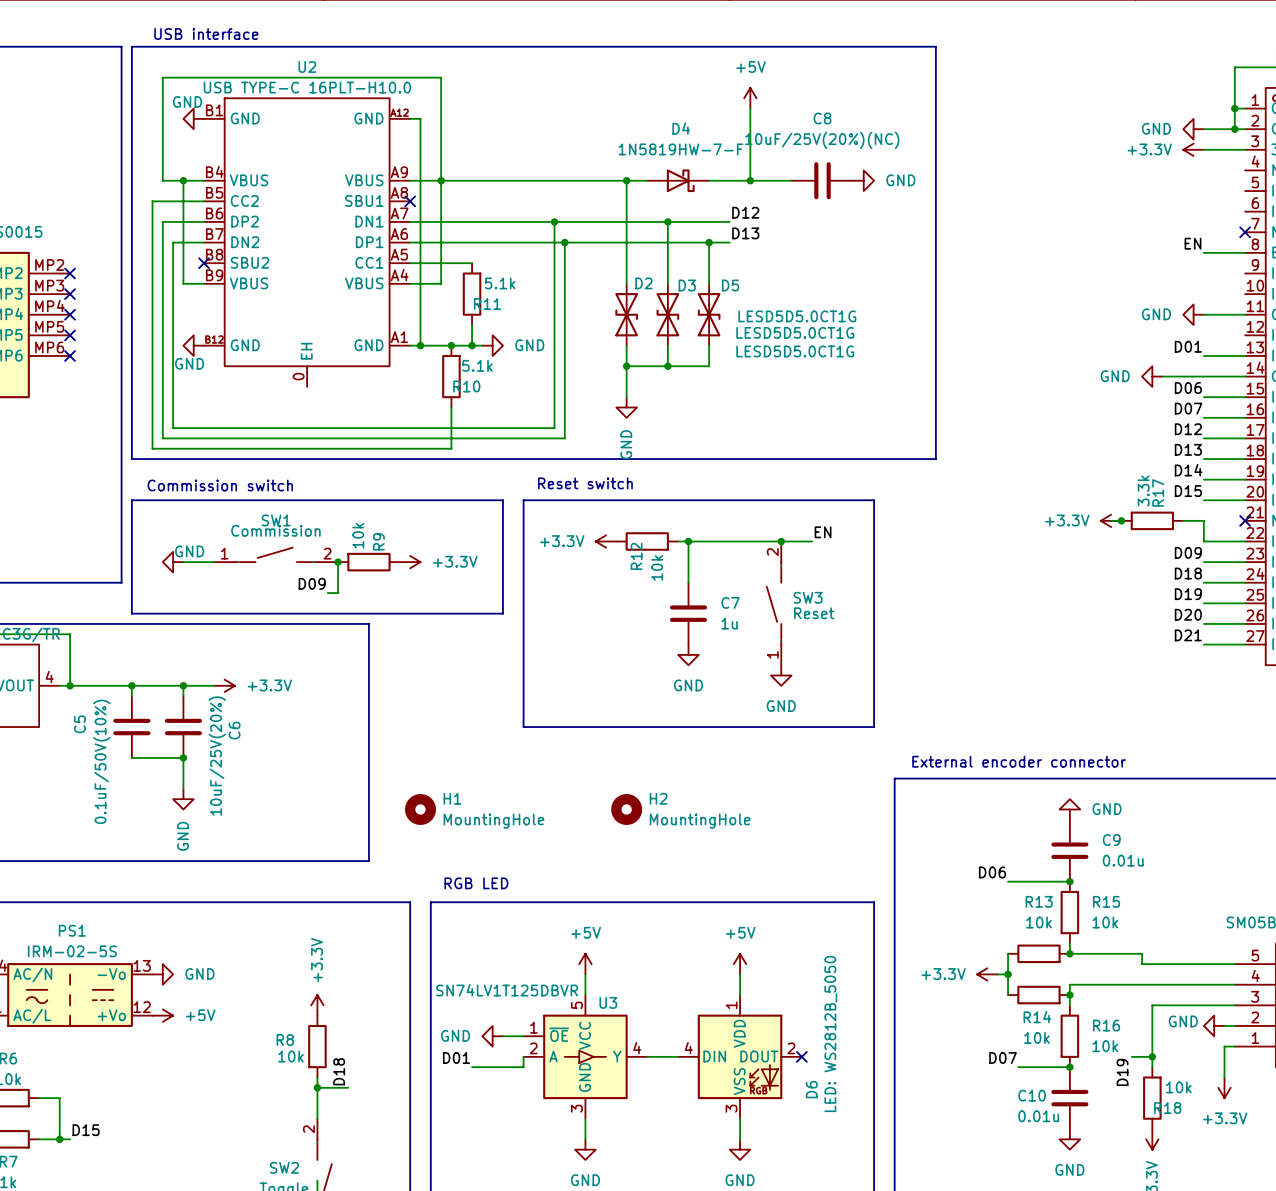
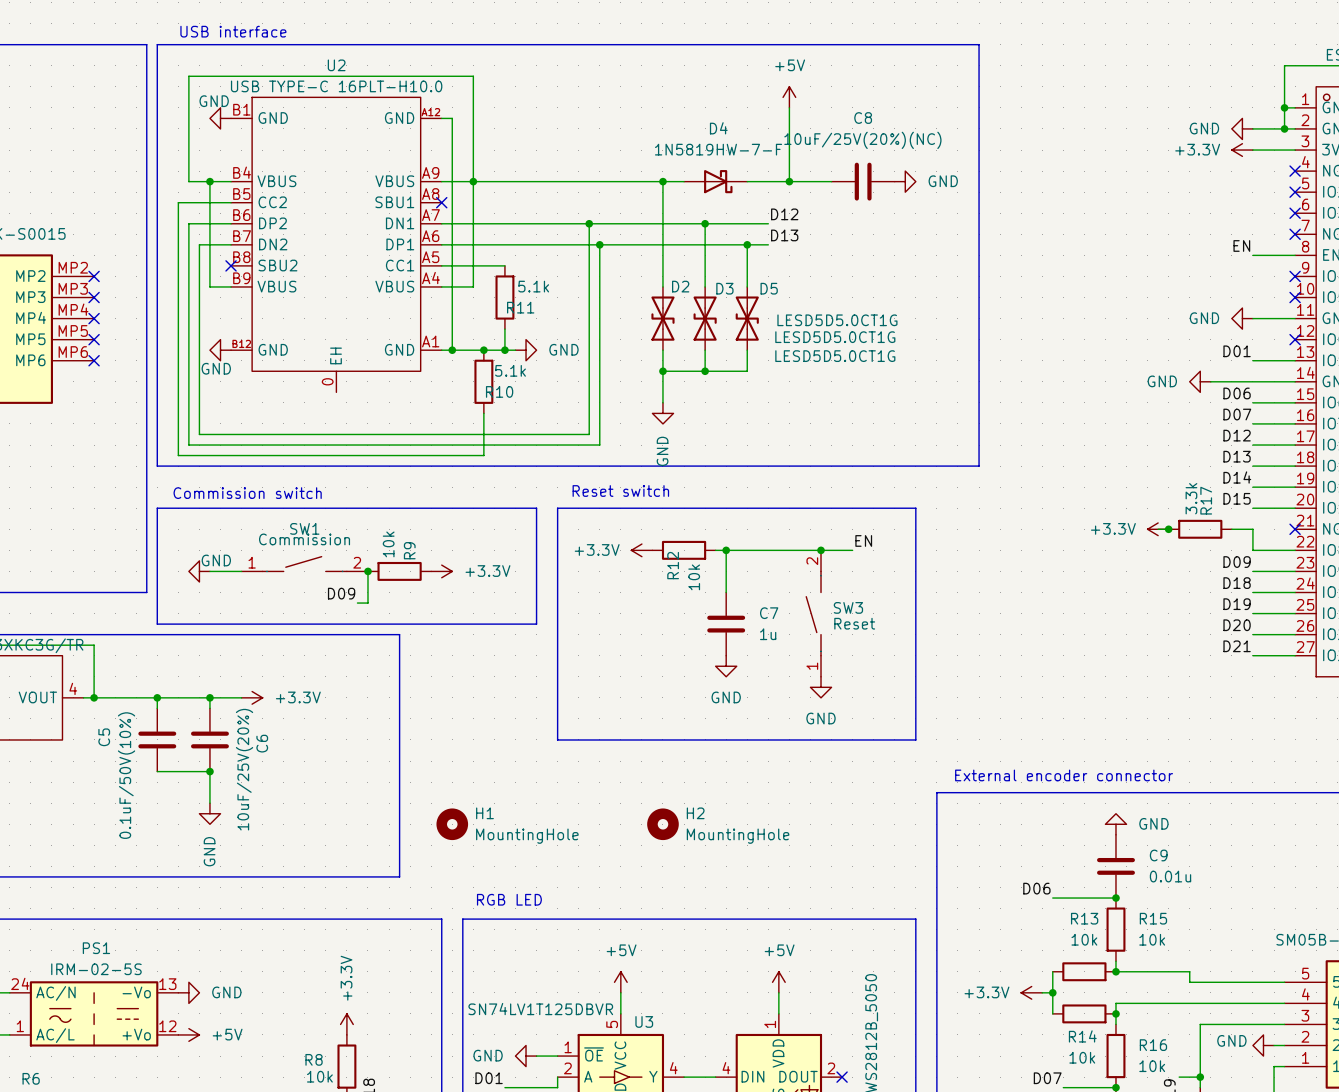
no-connect mark: none -> (1295, 171)
no-connect mark: none -> (1295, 192)
no-connect mark: none -> (1295, 213)
no-connect mark: none -> (1295, 276)
no-connect mark: none -> (1295, 297)
no-connect mark: none -> (1295, 339)

